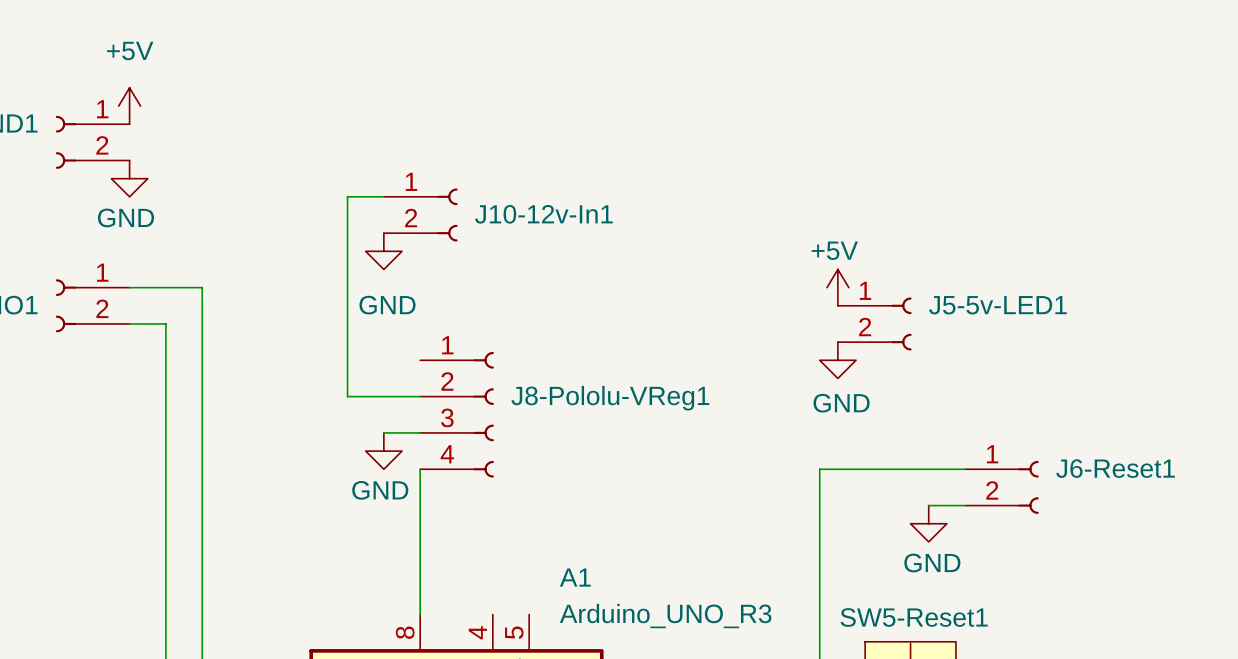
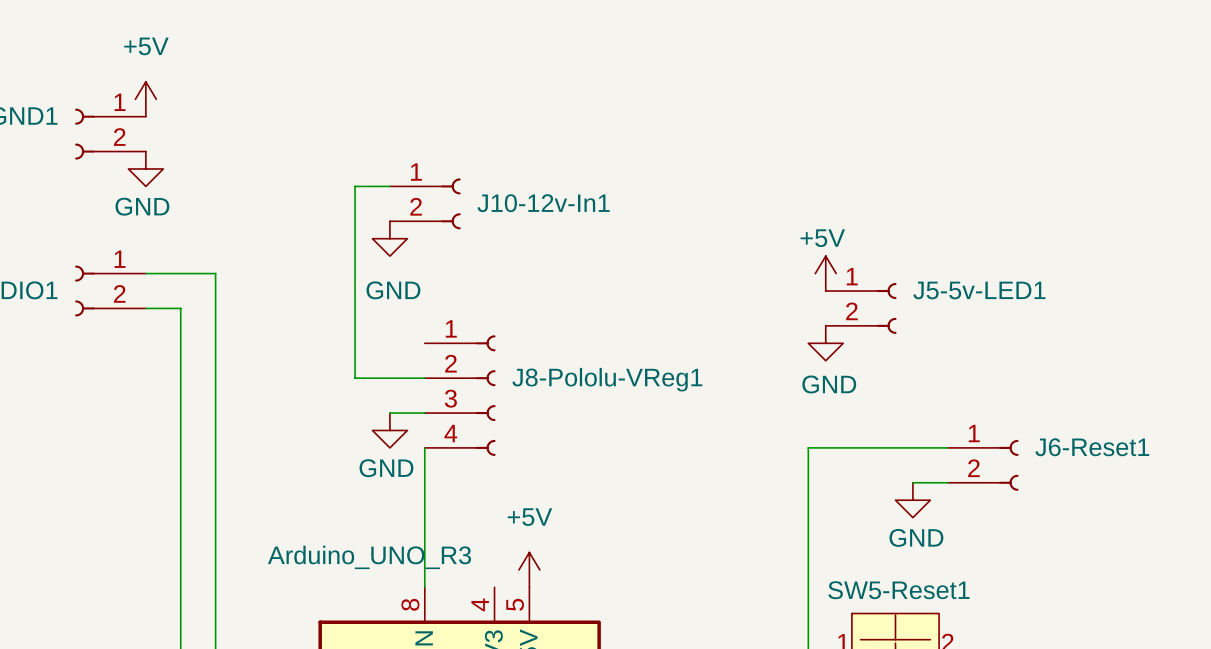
A1 name: A1 (575, 577) -> none
power symbol: none -> +5V (529, 569)
A1 value position: Arduino_UNO_R3 (665, 616) -> Arduino_UNO_R3 (369, 557)

